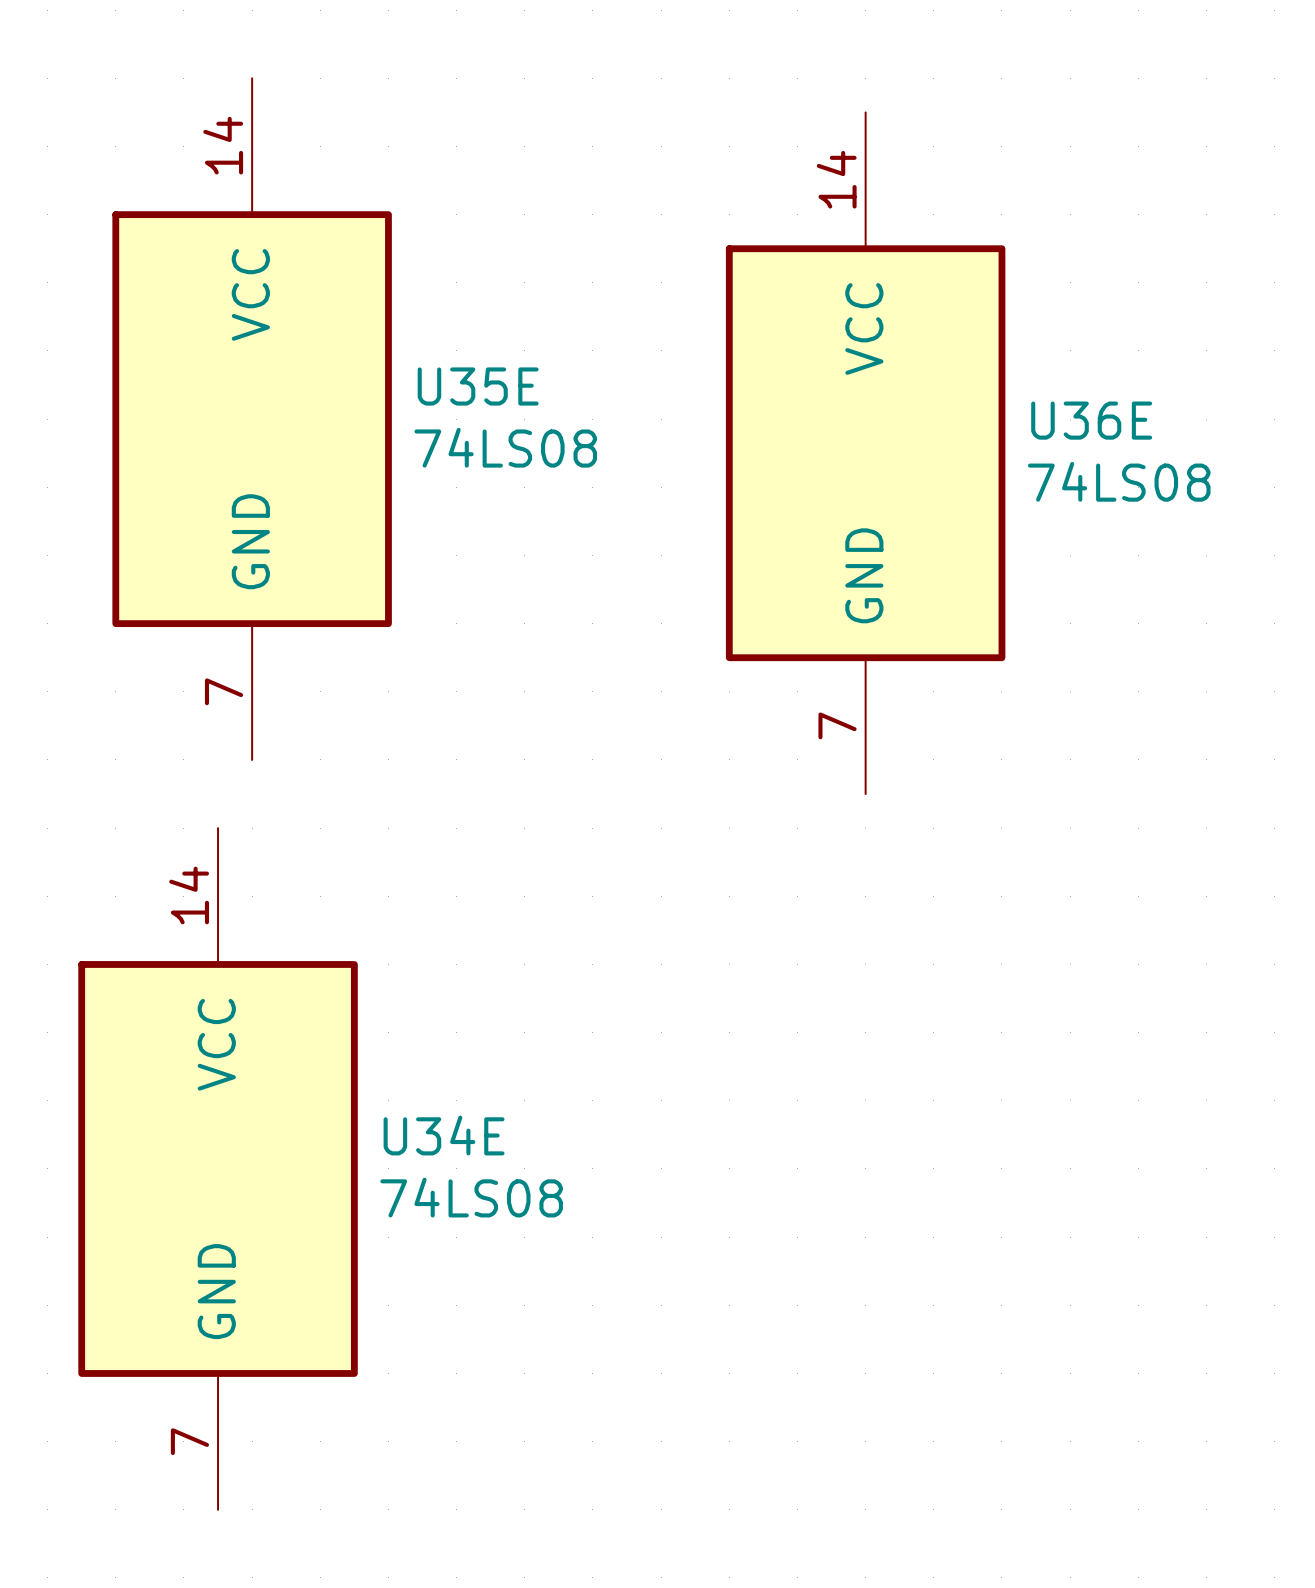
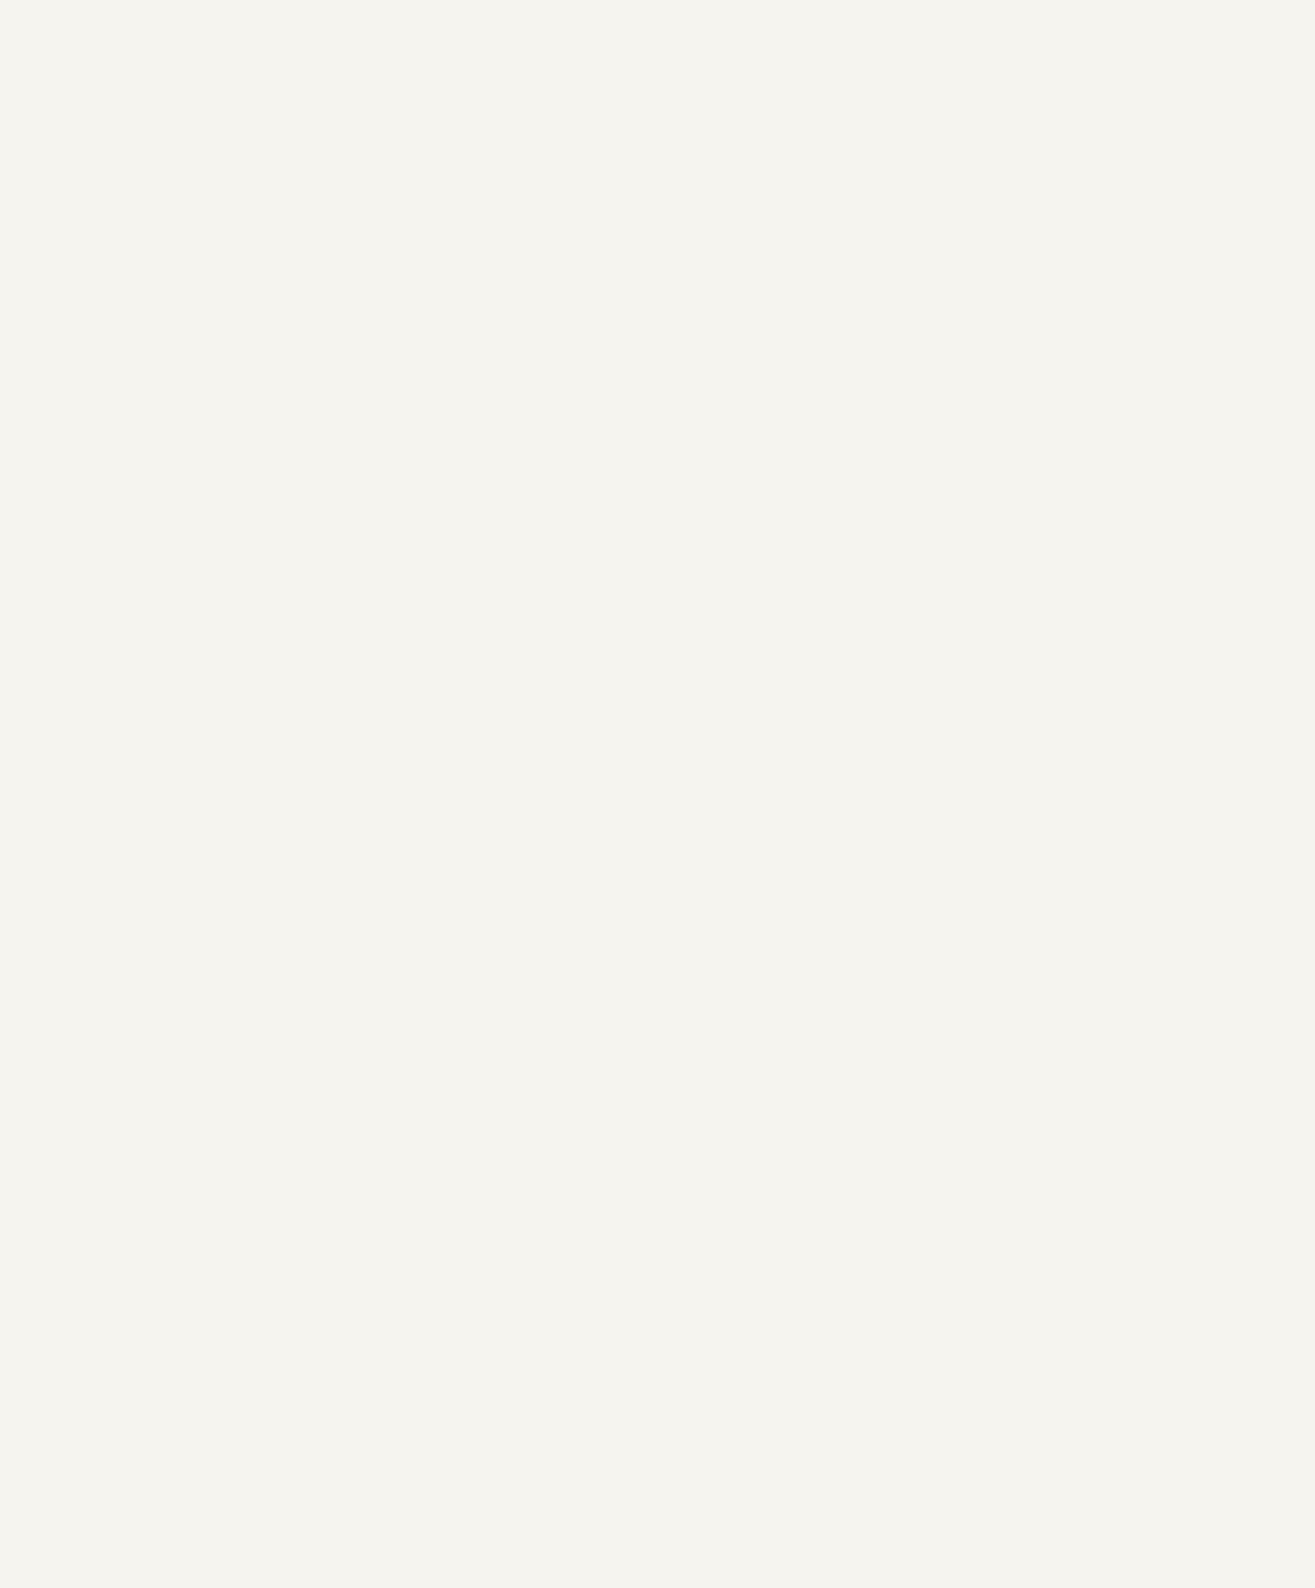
U35E: 74LS08 (252, 419) -> none
U36E: 74LS08 (865, 453) -> none
U34E: 74LS08 (218, 1168) -> none

